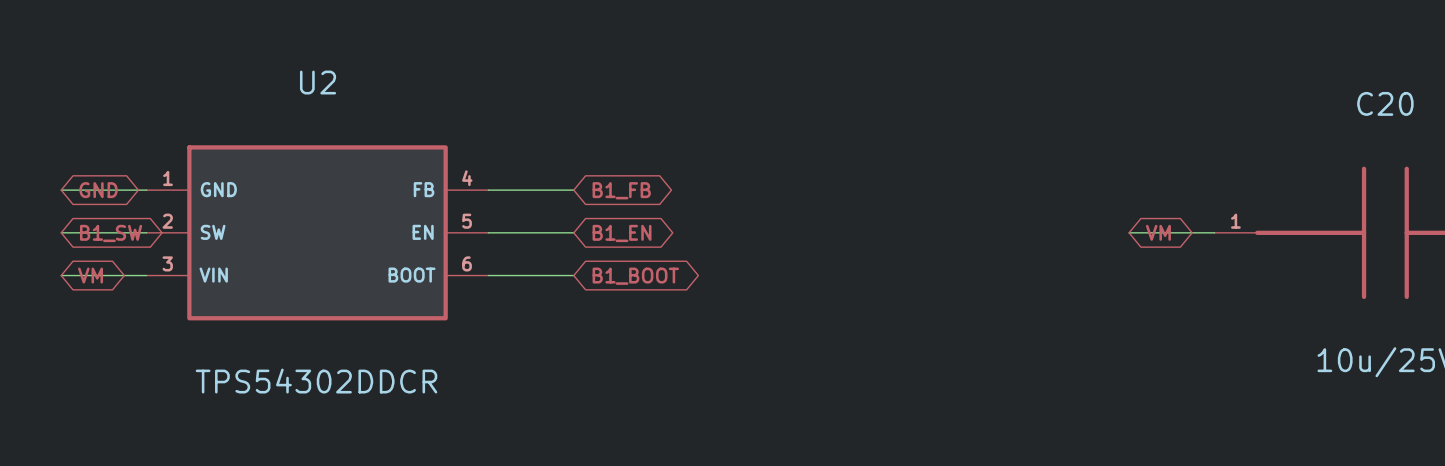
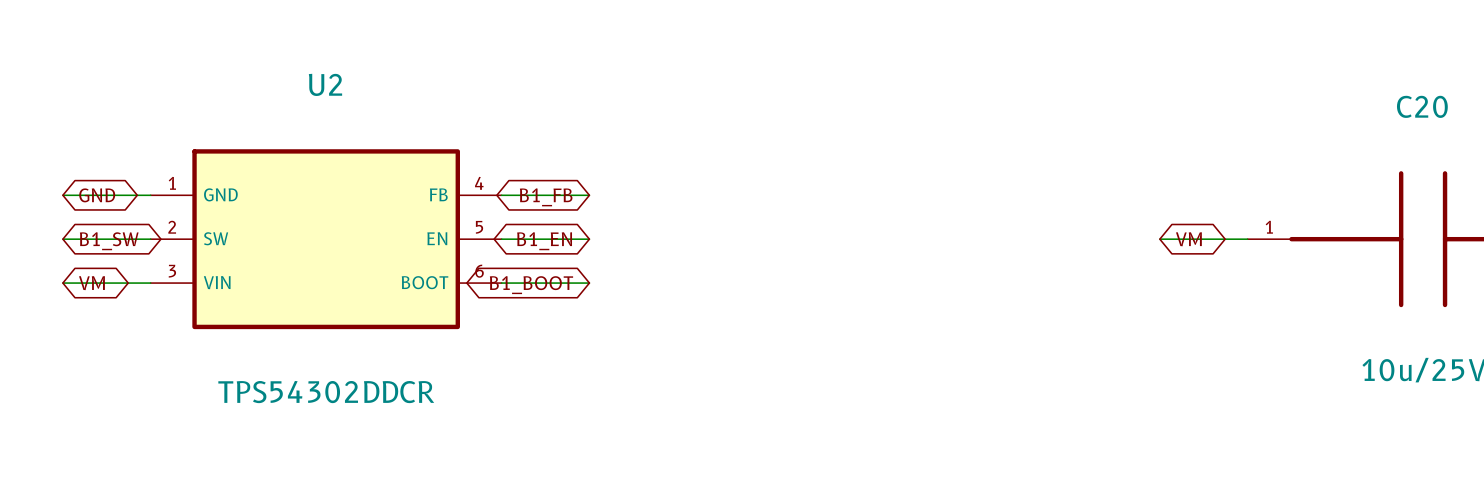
global label rotation: 0° (621, 190) -> 180° (546, 197)
global label rotation: 0° (622, 233) -> 180° (544, 241)
global label rotation: 0° (635, 276) -> 180° (531, 285)

